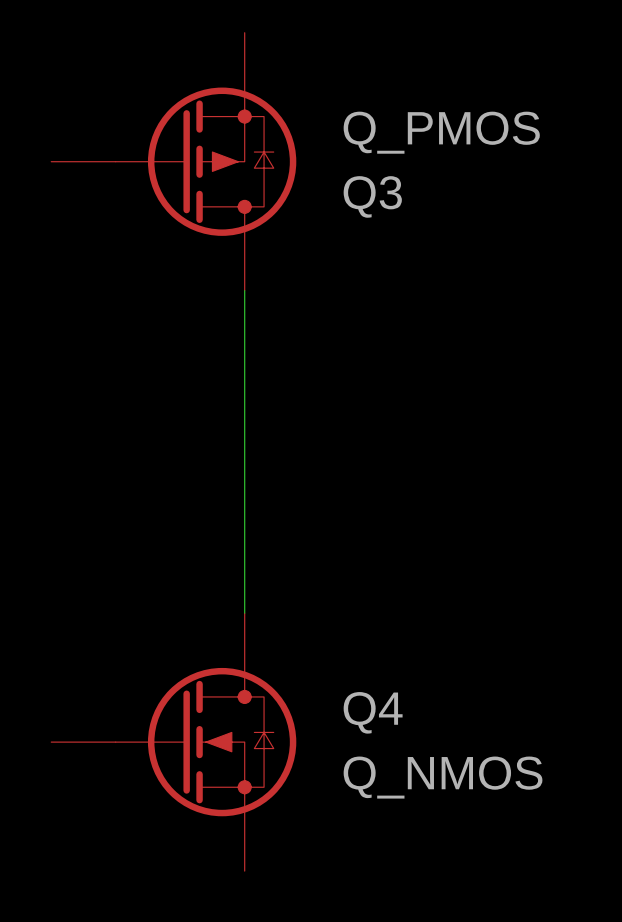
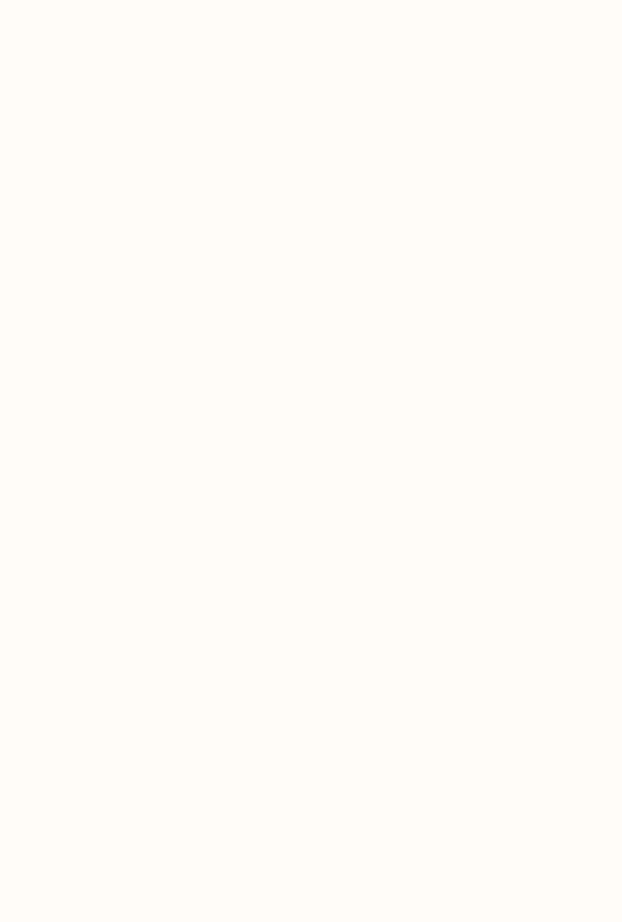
Q3: Q_PMOS (173, 161) -> none
wire: (244, 290) (244, 613) -> none
Q4: Q_NMOS (173, 742) -> none

